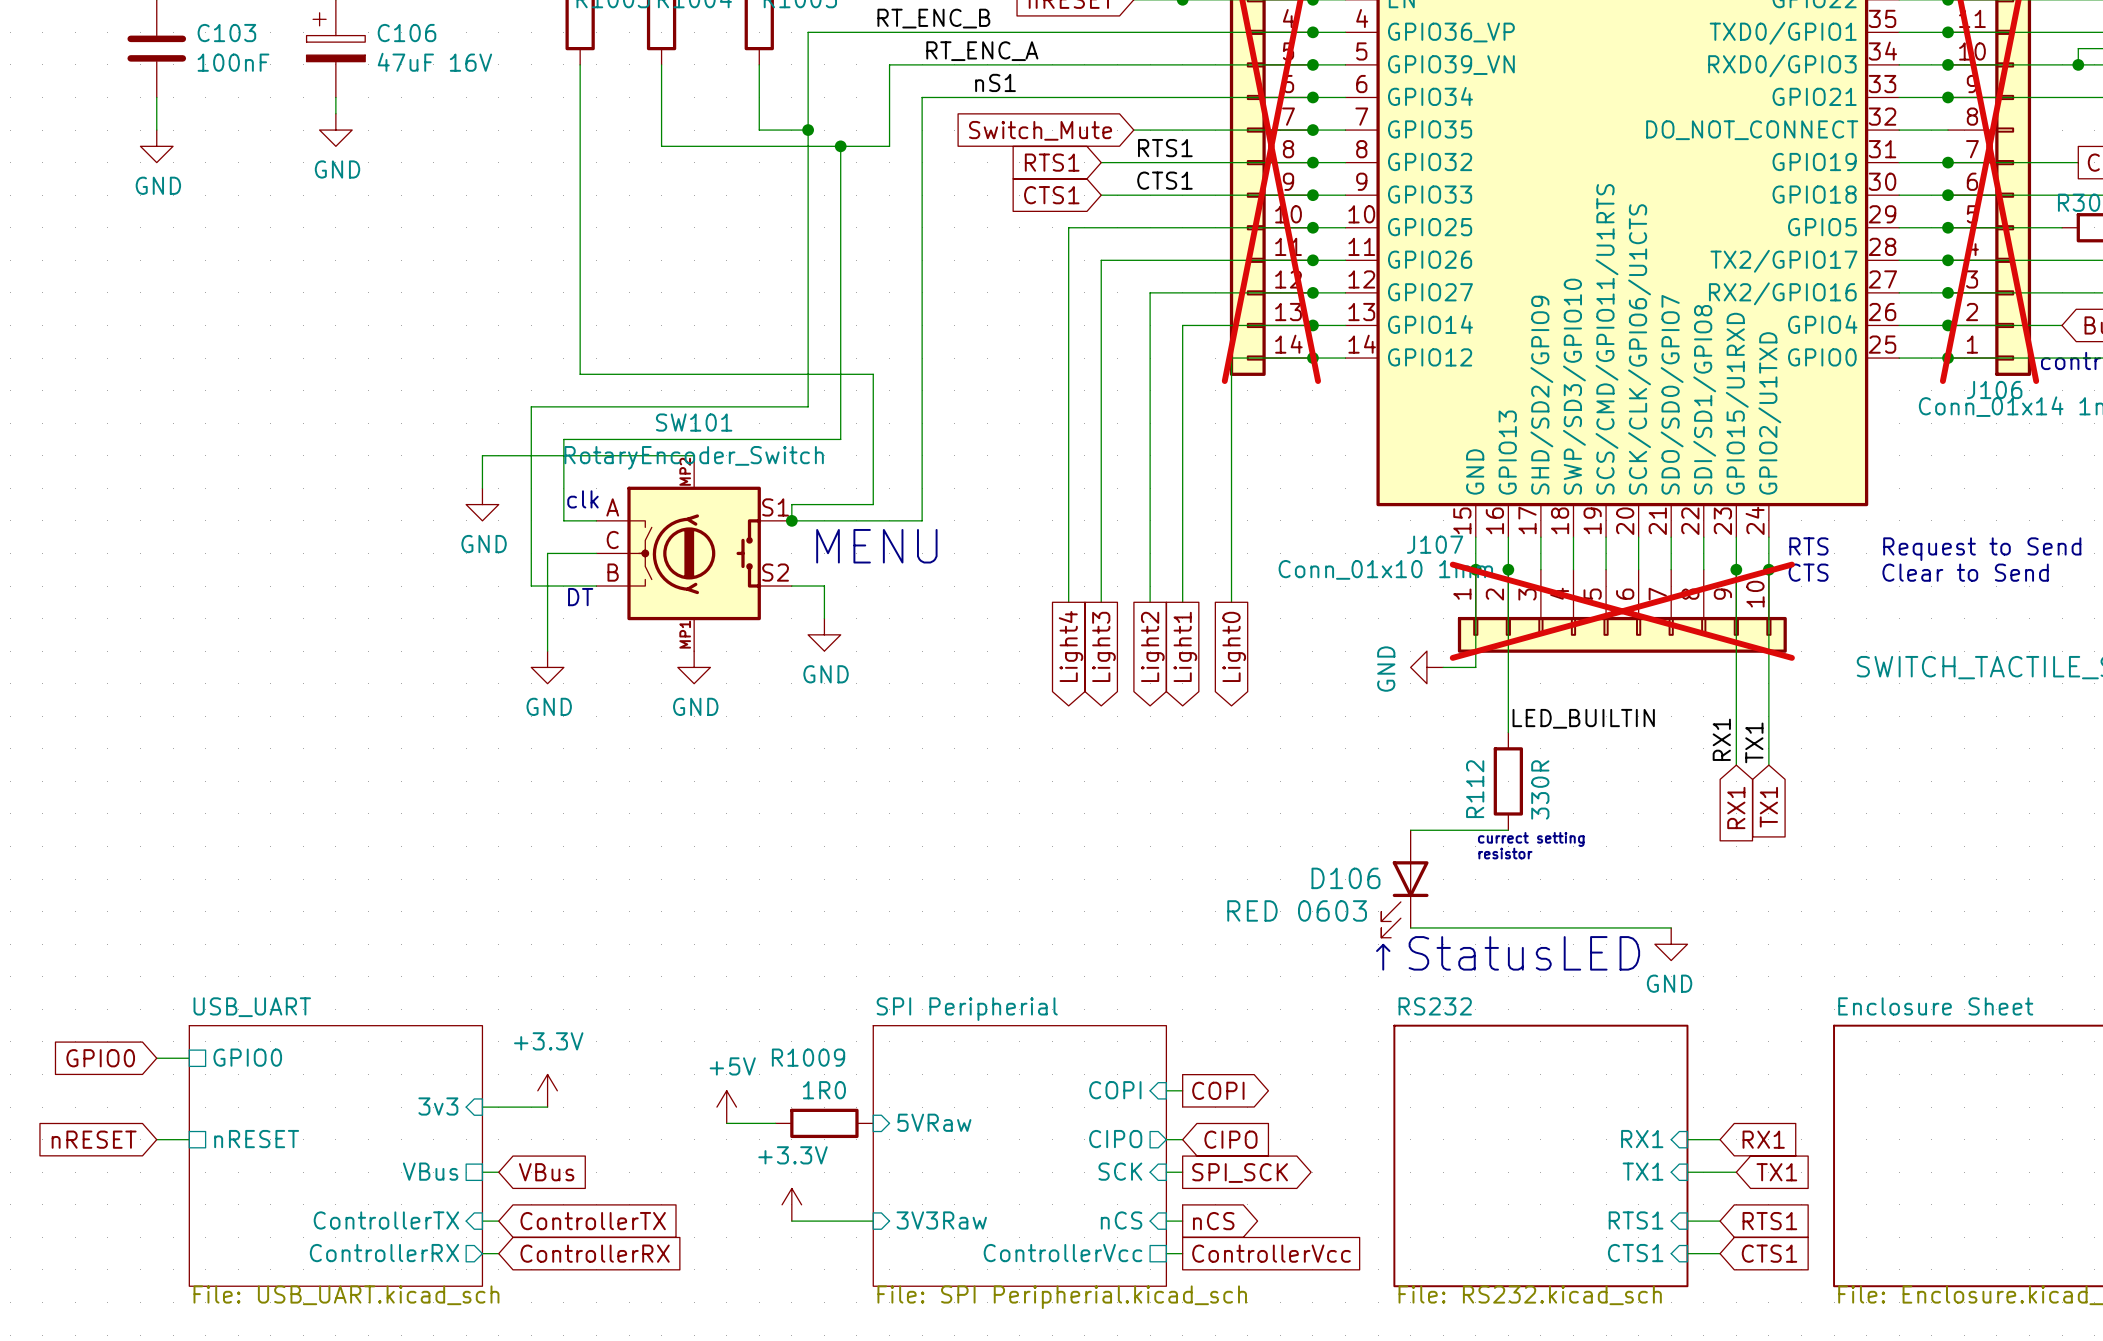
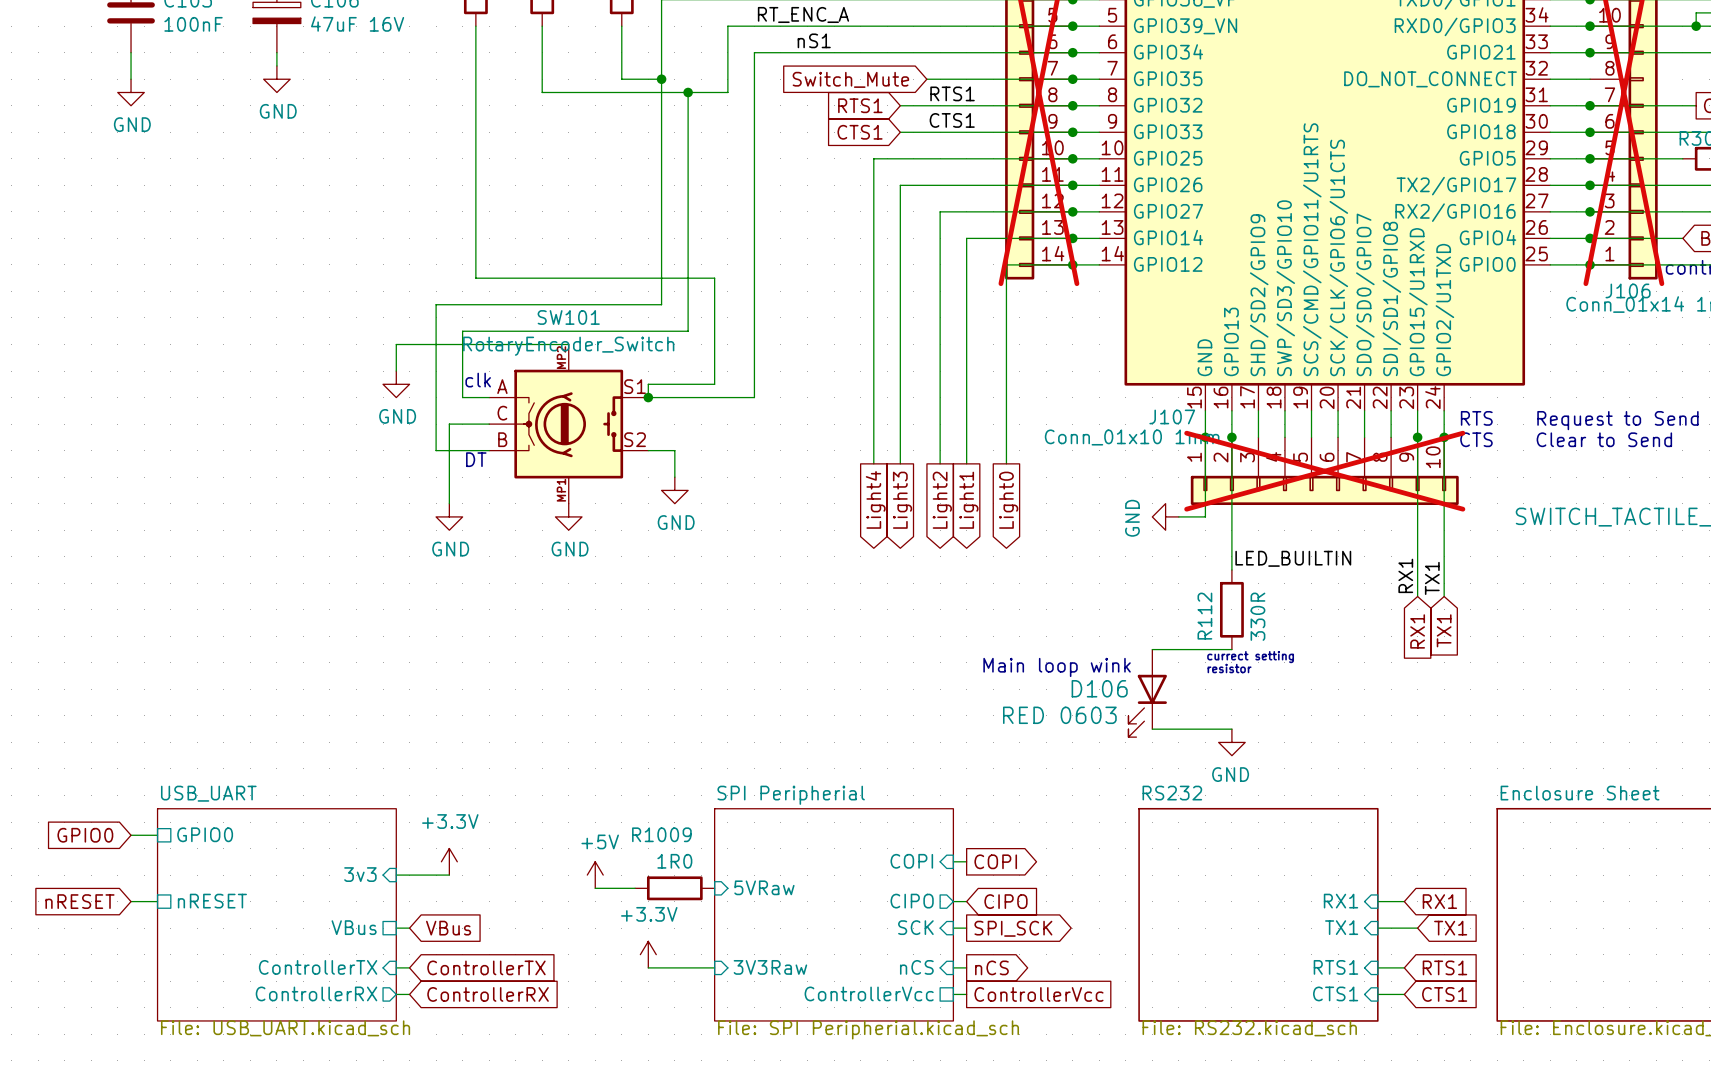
text: MENU (876, 546) -> none
text: none -> Main loop wink (1057, 667)
wire: (1508, 927) (1671, 927) -> none
power symbol position: GND (1671, 944) -> GND (1231, 742)
text: ↑StatusLED (1508, 953) -> none

